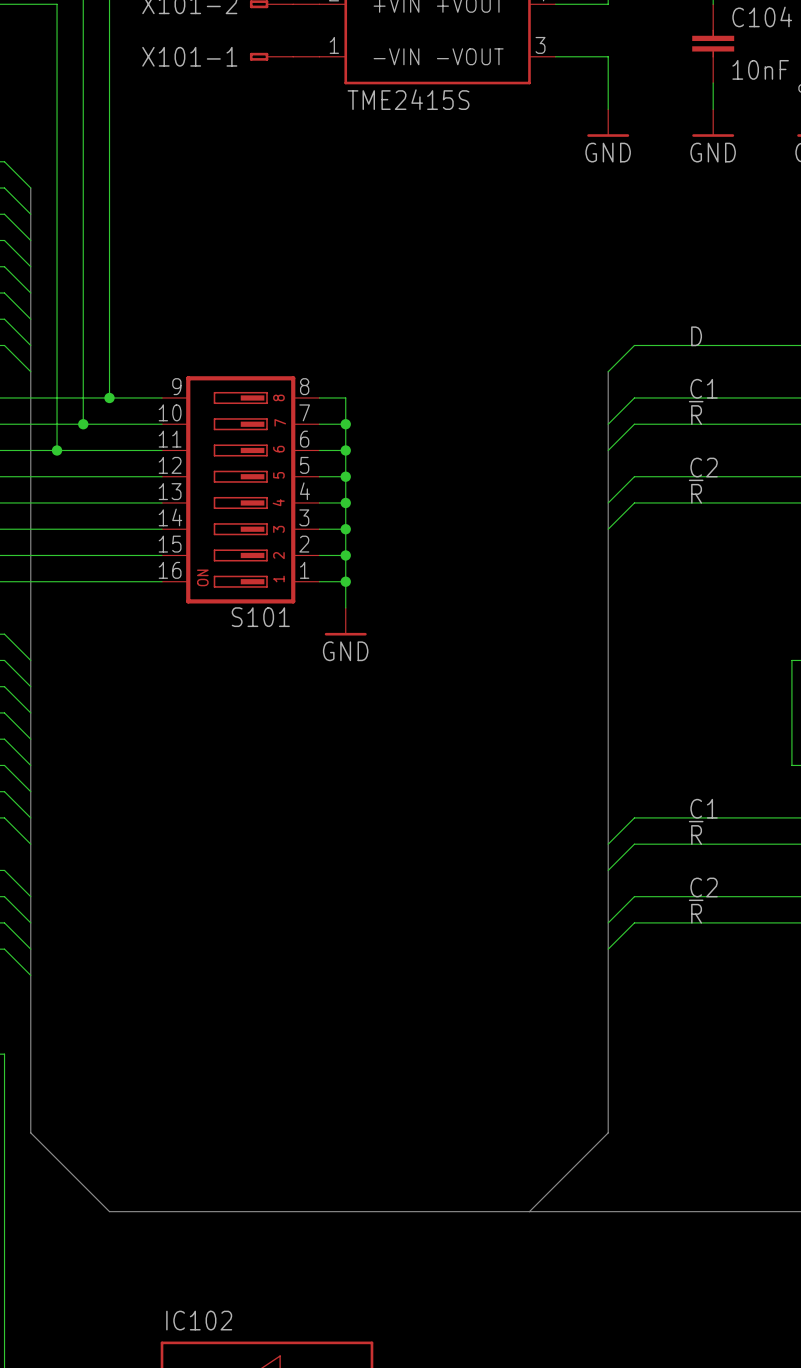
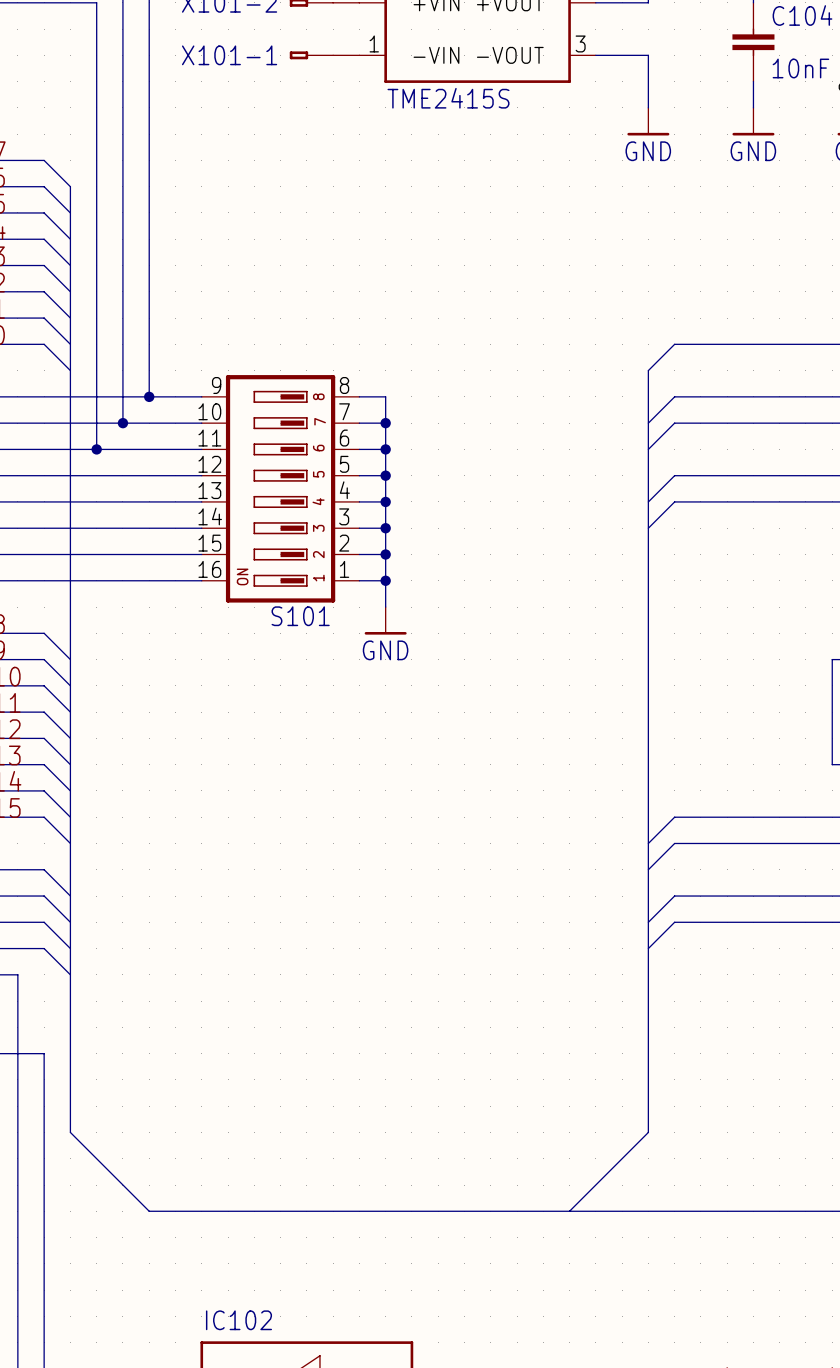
label: D (696, 336) -> none
label: C1 (704, 388) -> none
label: ~{R} (696, 412) -> none
label: C2 (704, 467) -> none
label: ~{R} (696, 491) -> none
label: C1 (704, 808) -> none
label: ~{R} (696, 832) -> none
label: C2 (704, 887) -> none
label: ~{R} (696, 911) -> none

